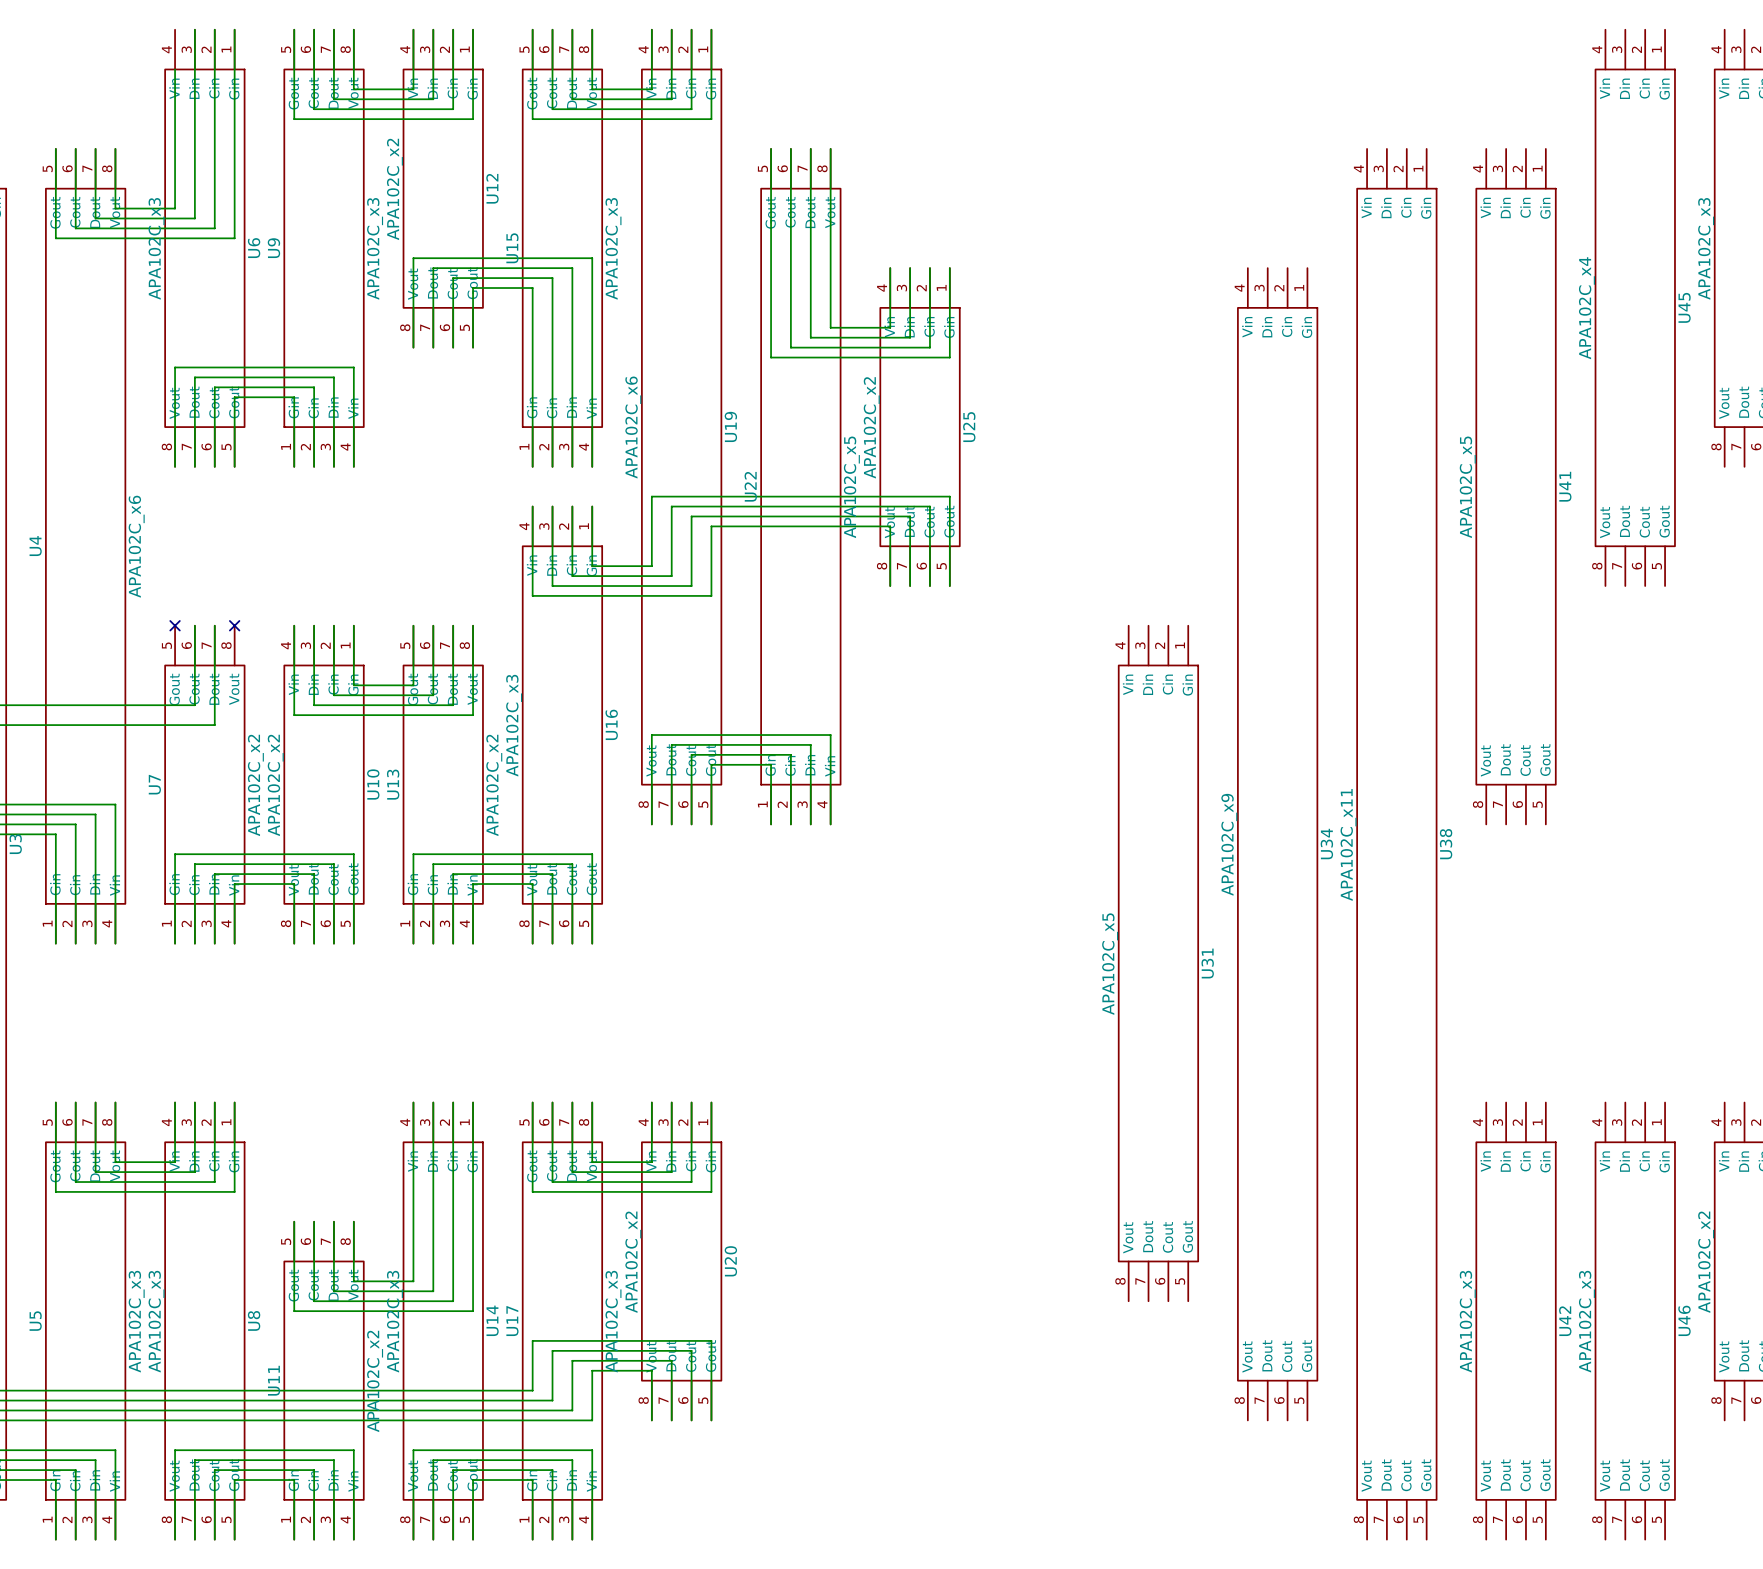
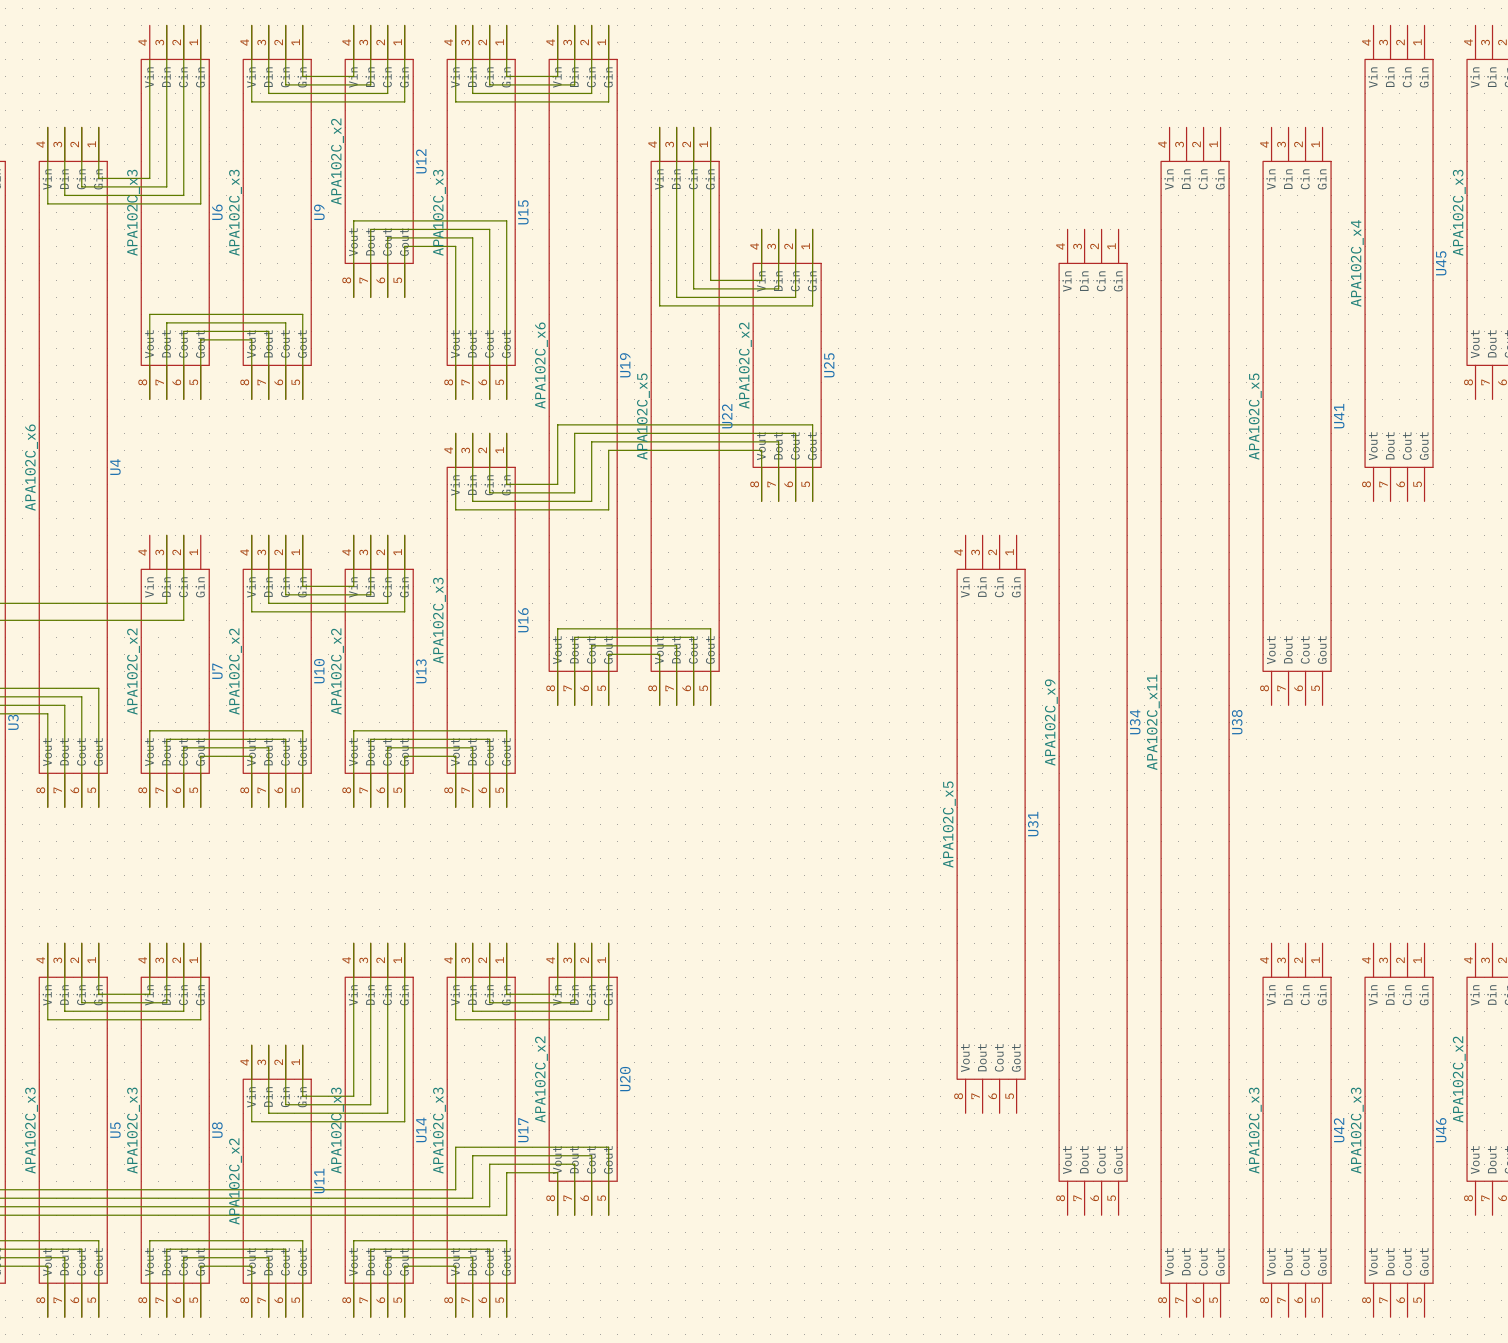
U9 rotation: 0° (324, 248) -> 180° (277, 212)
U15 rotation: 0° (562, 248) -> 180° (481, 212)
U22 rotation: 0° (800, 486) -> 180° (685, 416)
U4 rotation: 0° (85, 546) -> 180° (73, 467)
no-connect mark: (175, 625) -> none
no-connect mark: (234, 625) -> none
U7 rotation: 0° (204, 784) -> 180° (175, 671)
U13 rotation: 0° (443, 784) -> 180° (379, 671)
U5 rotation: 0° (85, 1321) -> 180° (73, 1130)
U17 rotation: 0° (562, 1321) -> 180° (481, 1130)
U11 rotation: 0° (324, 1380) -> 180° (277, 1181)

